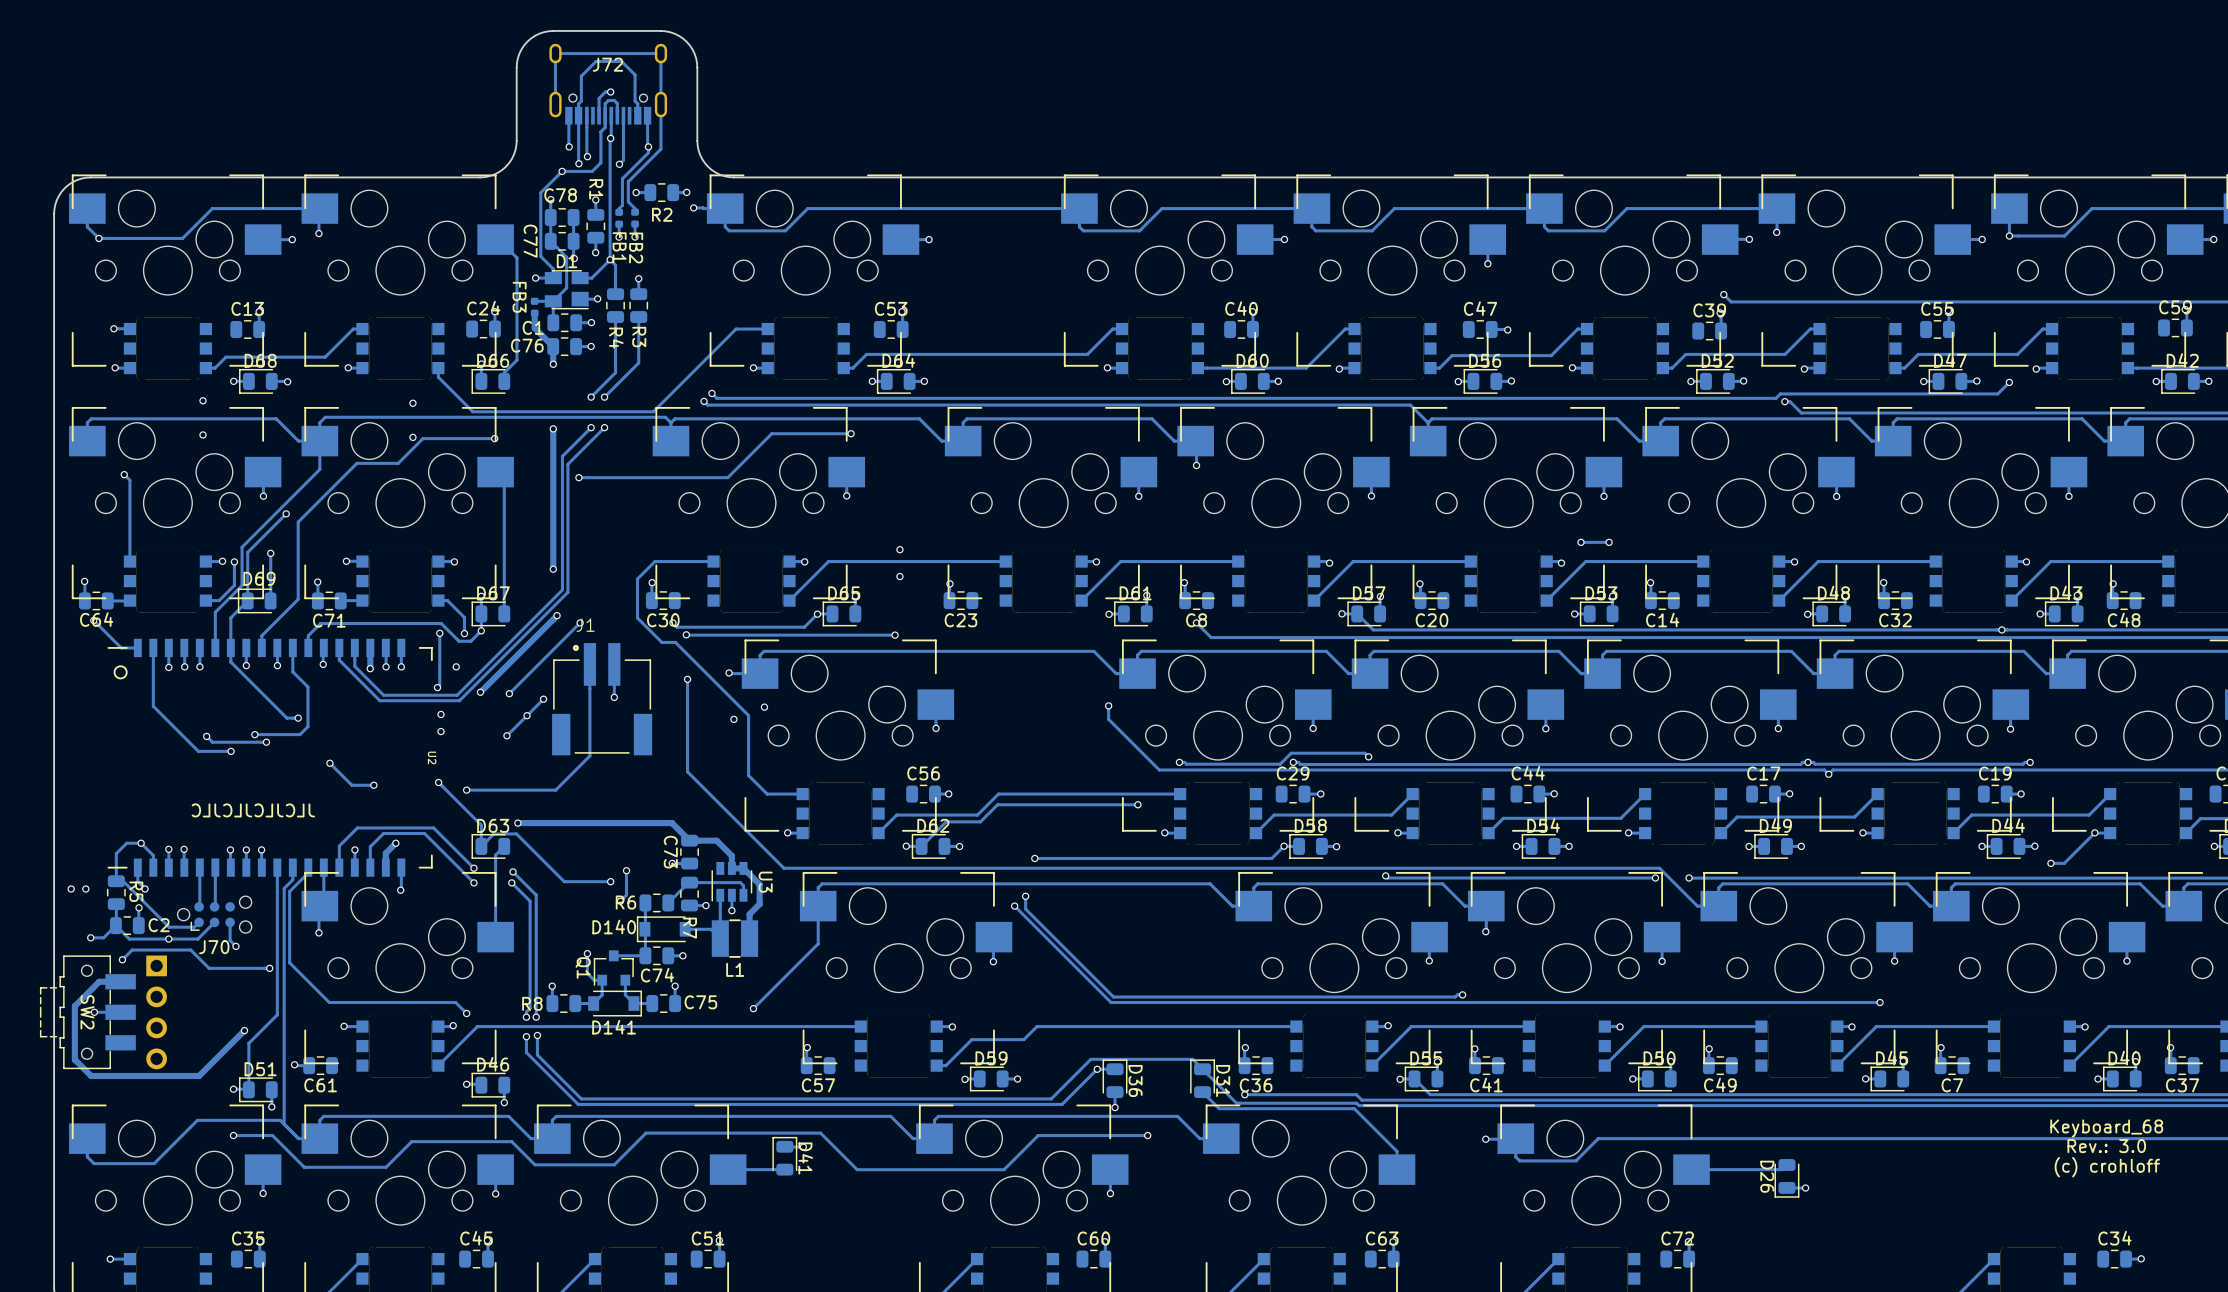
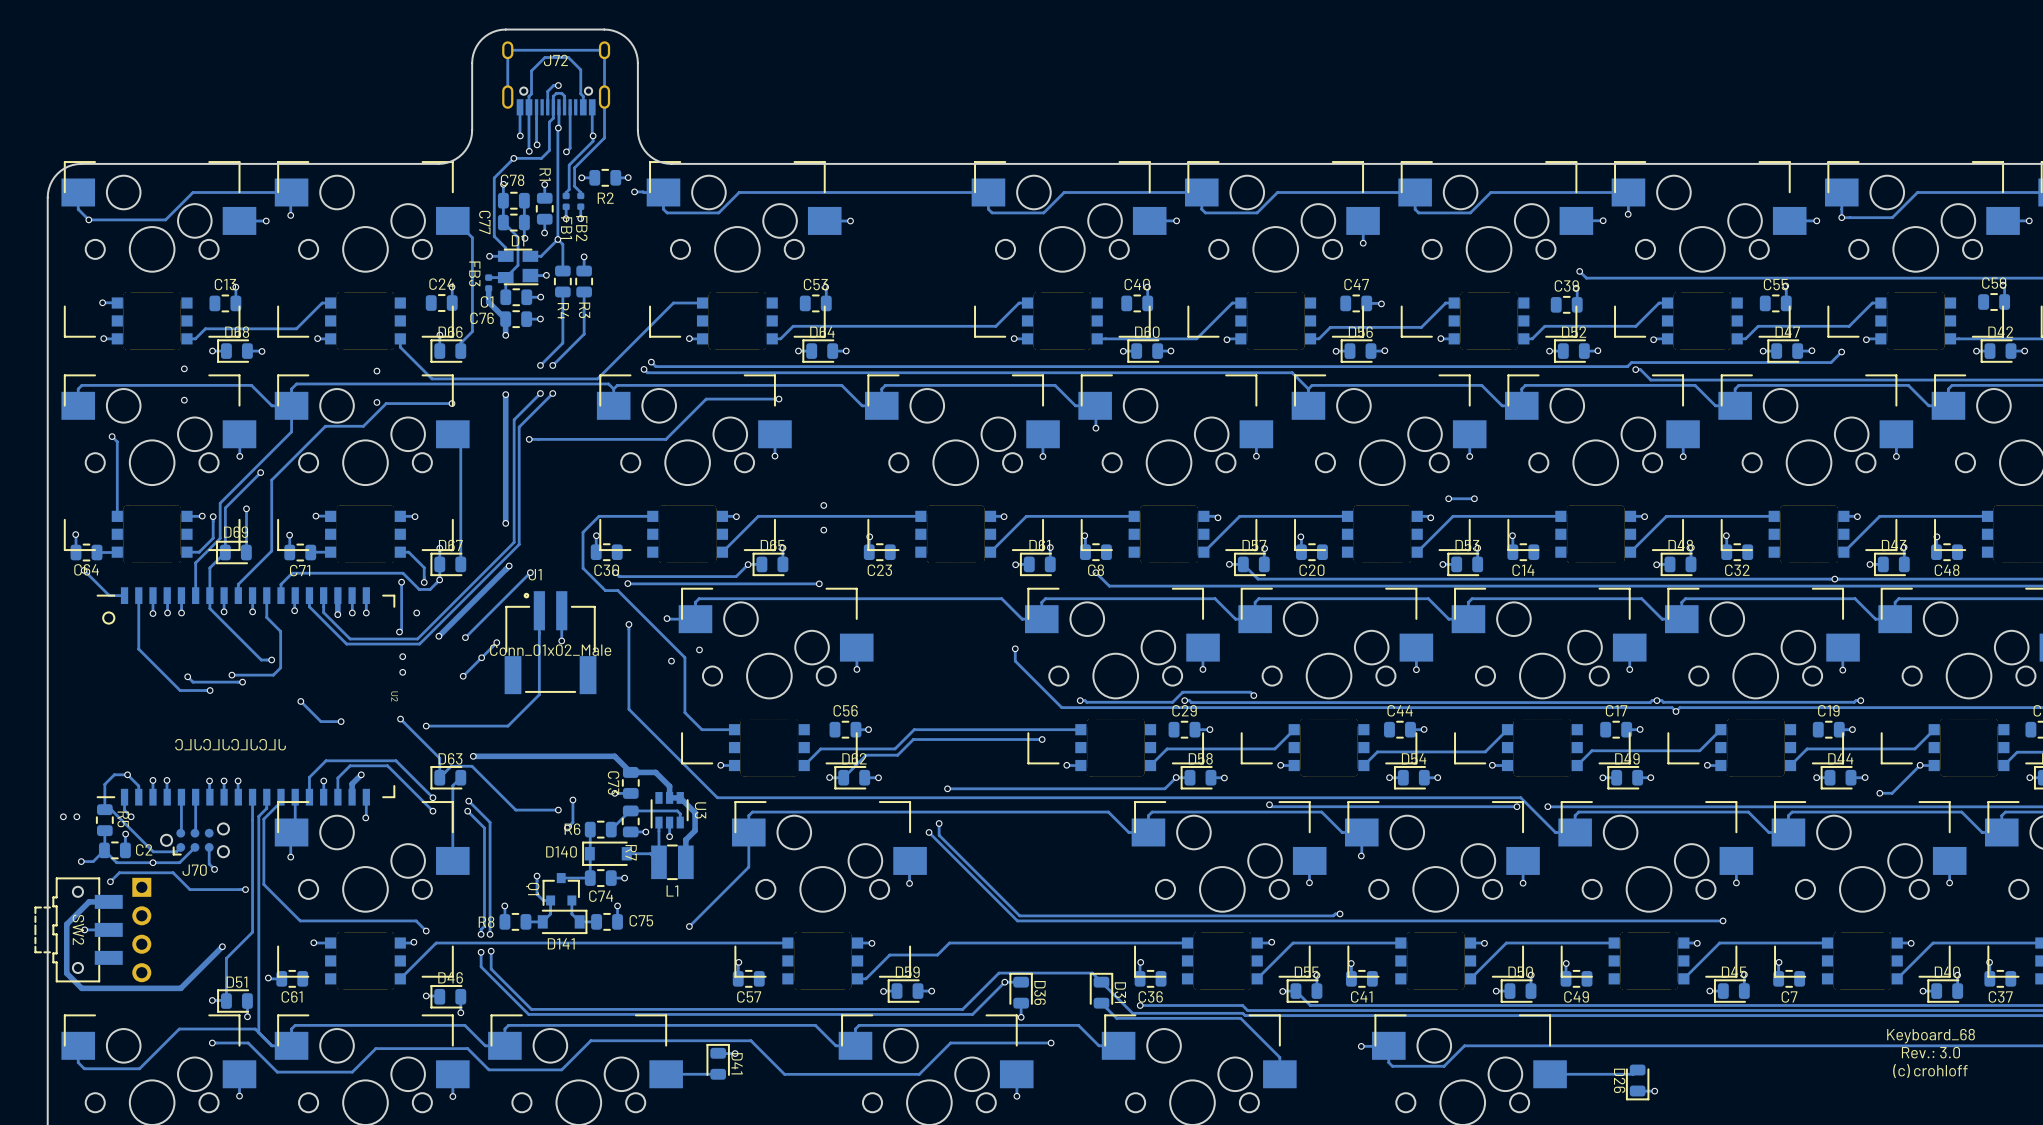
J1 value: none -> Conn_01x02_Male (550, 650)

